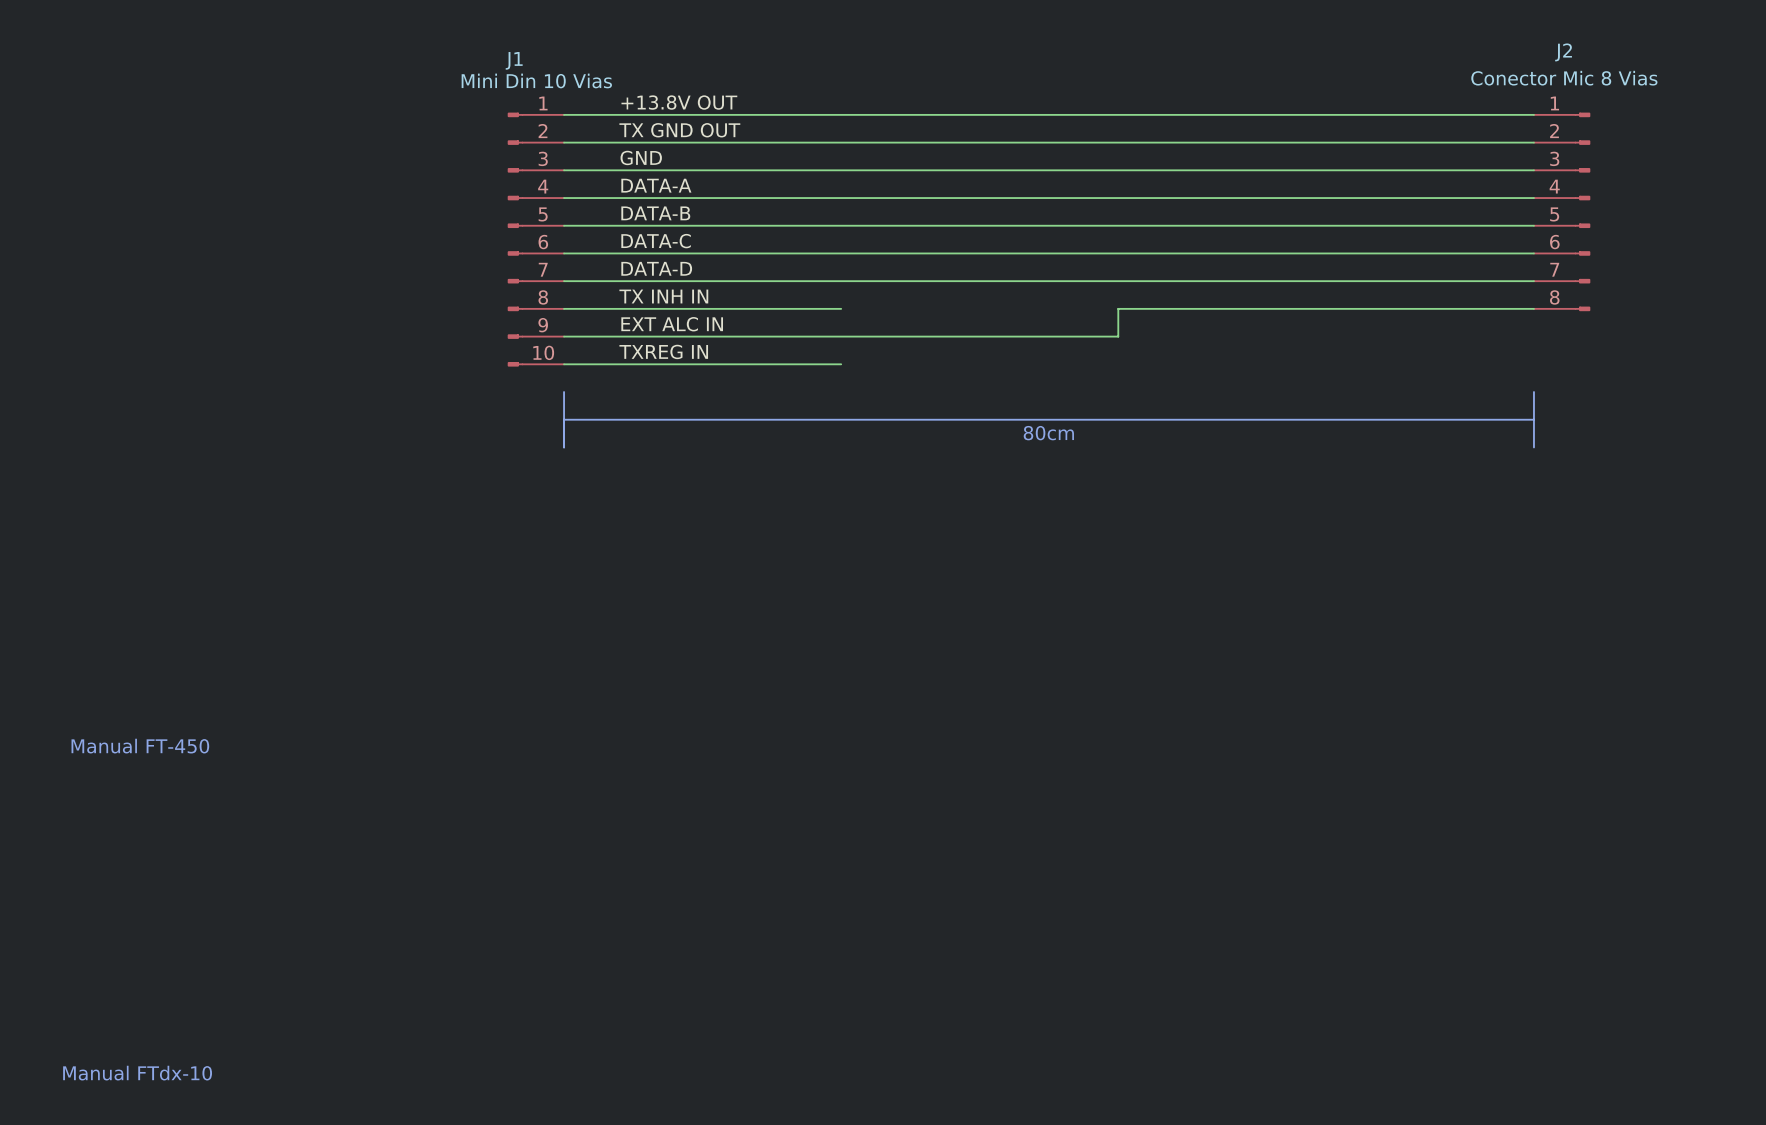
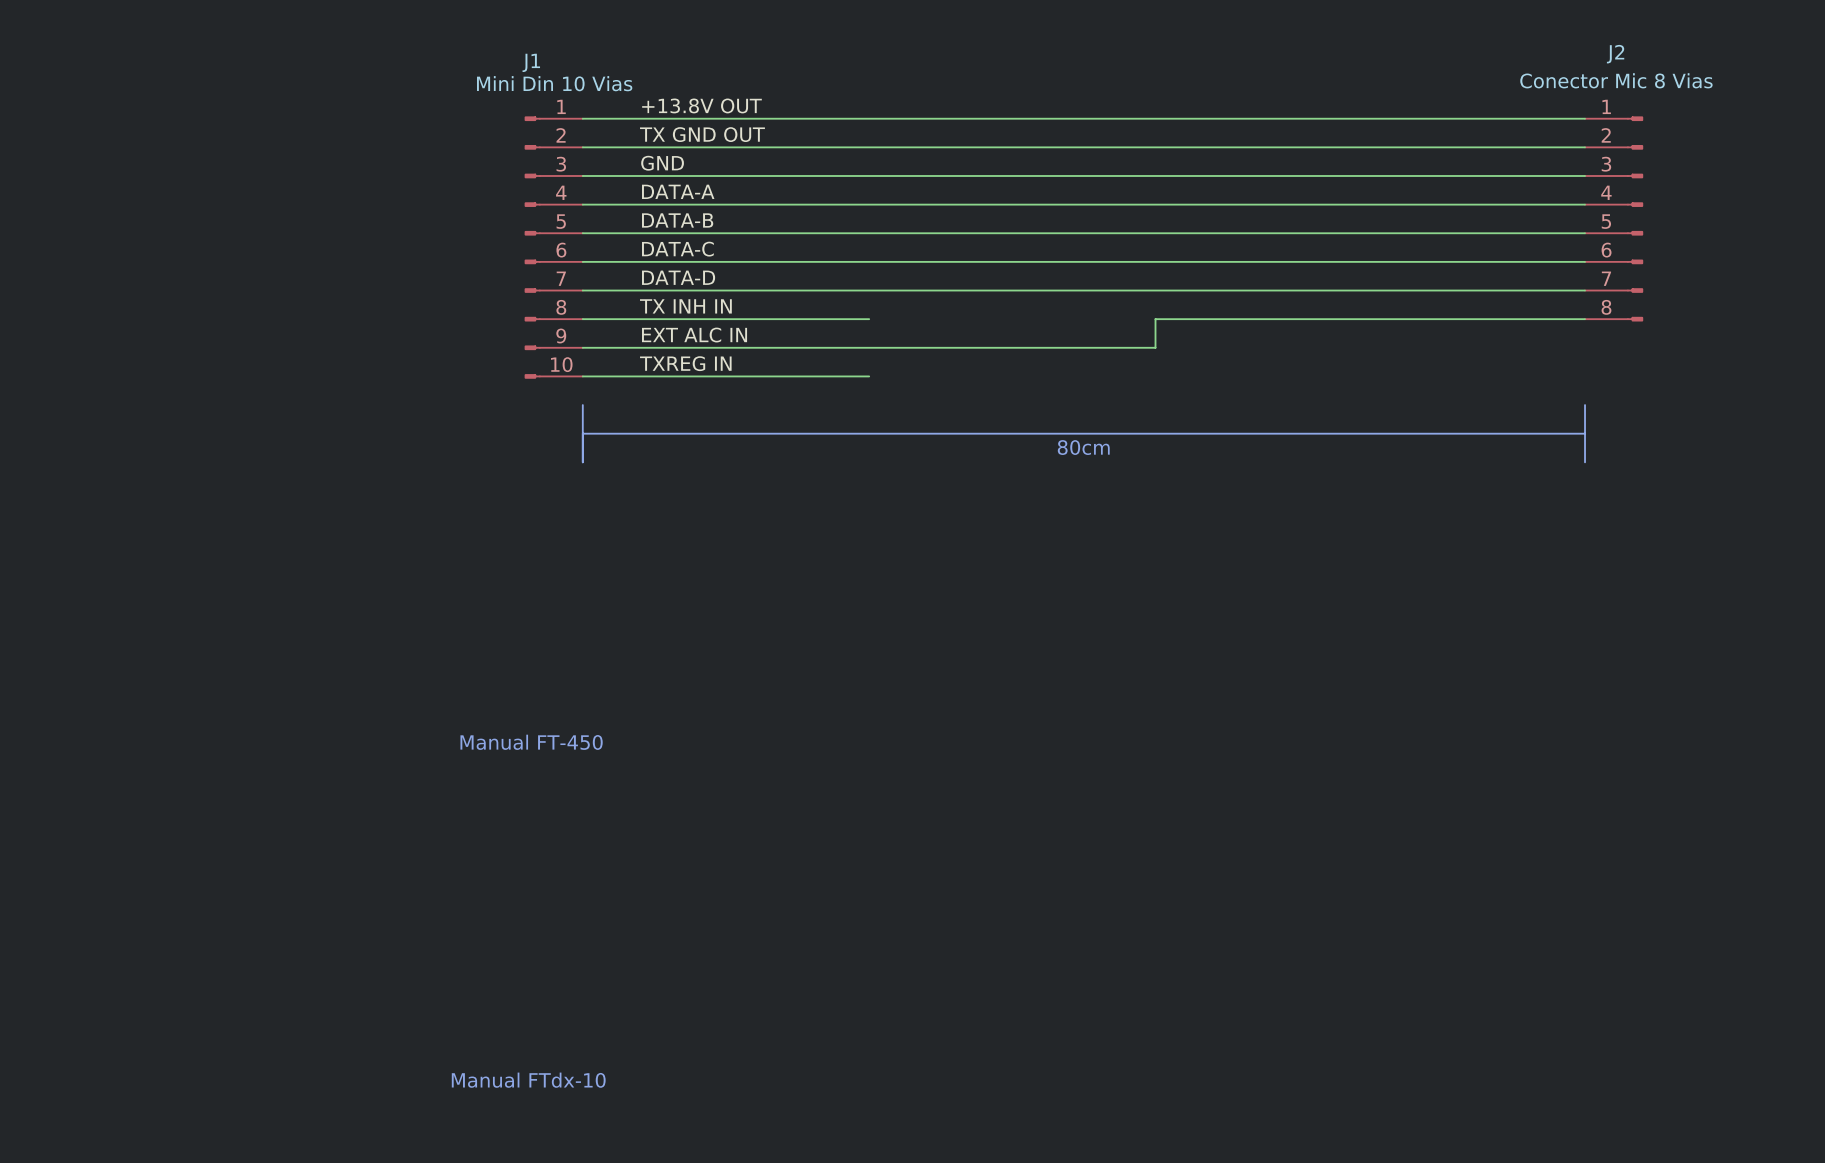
text: none -> Manual FT-450 (531, 742)
text: Manual FT-450 (140, 746) -> none
text: none -> Manual FTdx-10 (528, 1080)
text: Manual FTdx-10 (137, 1073) -> none

